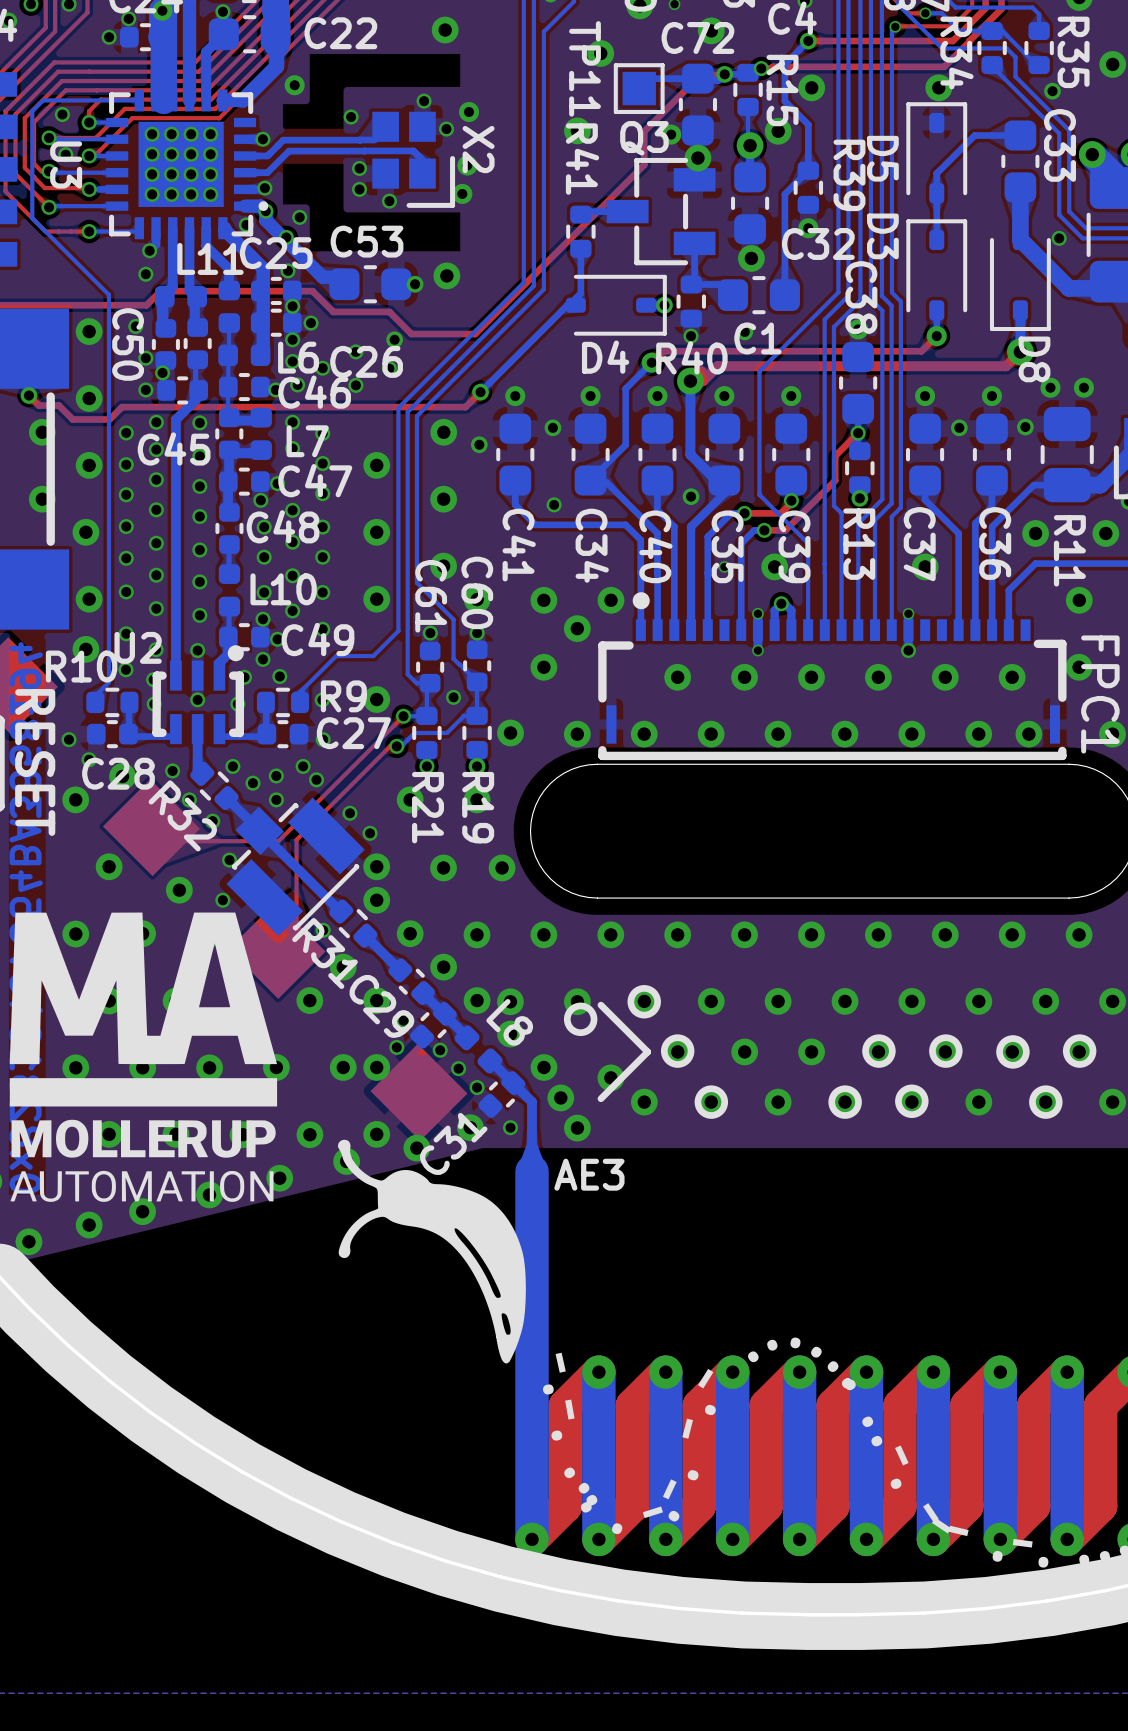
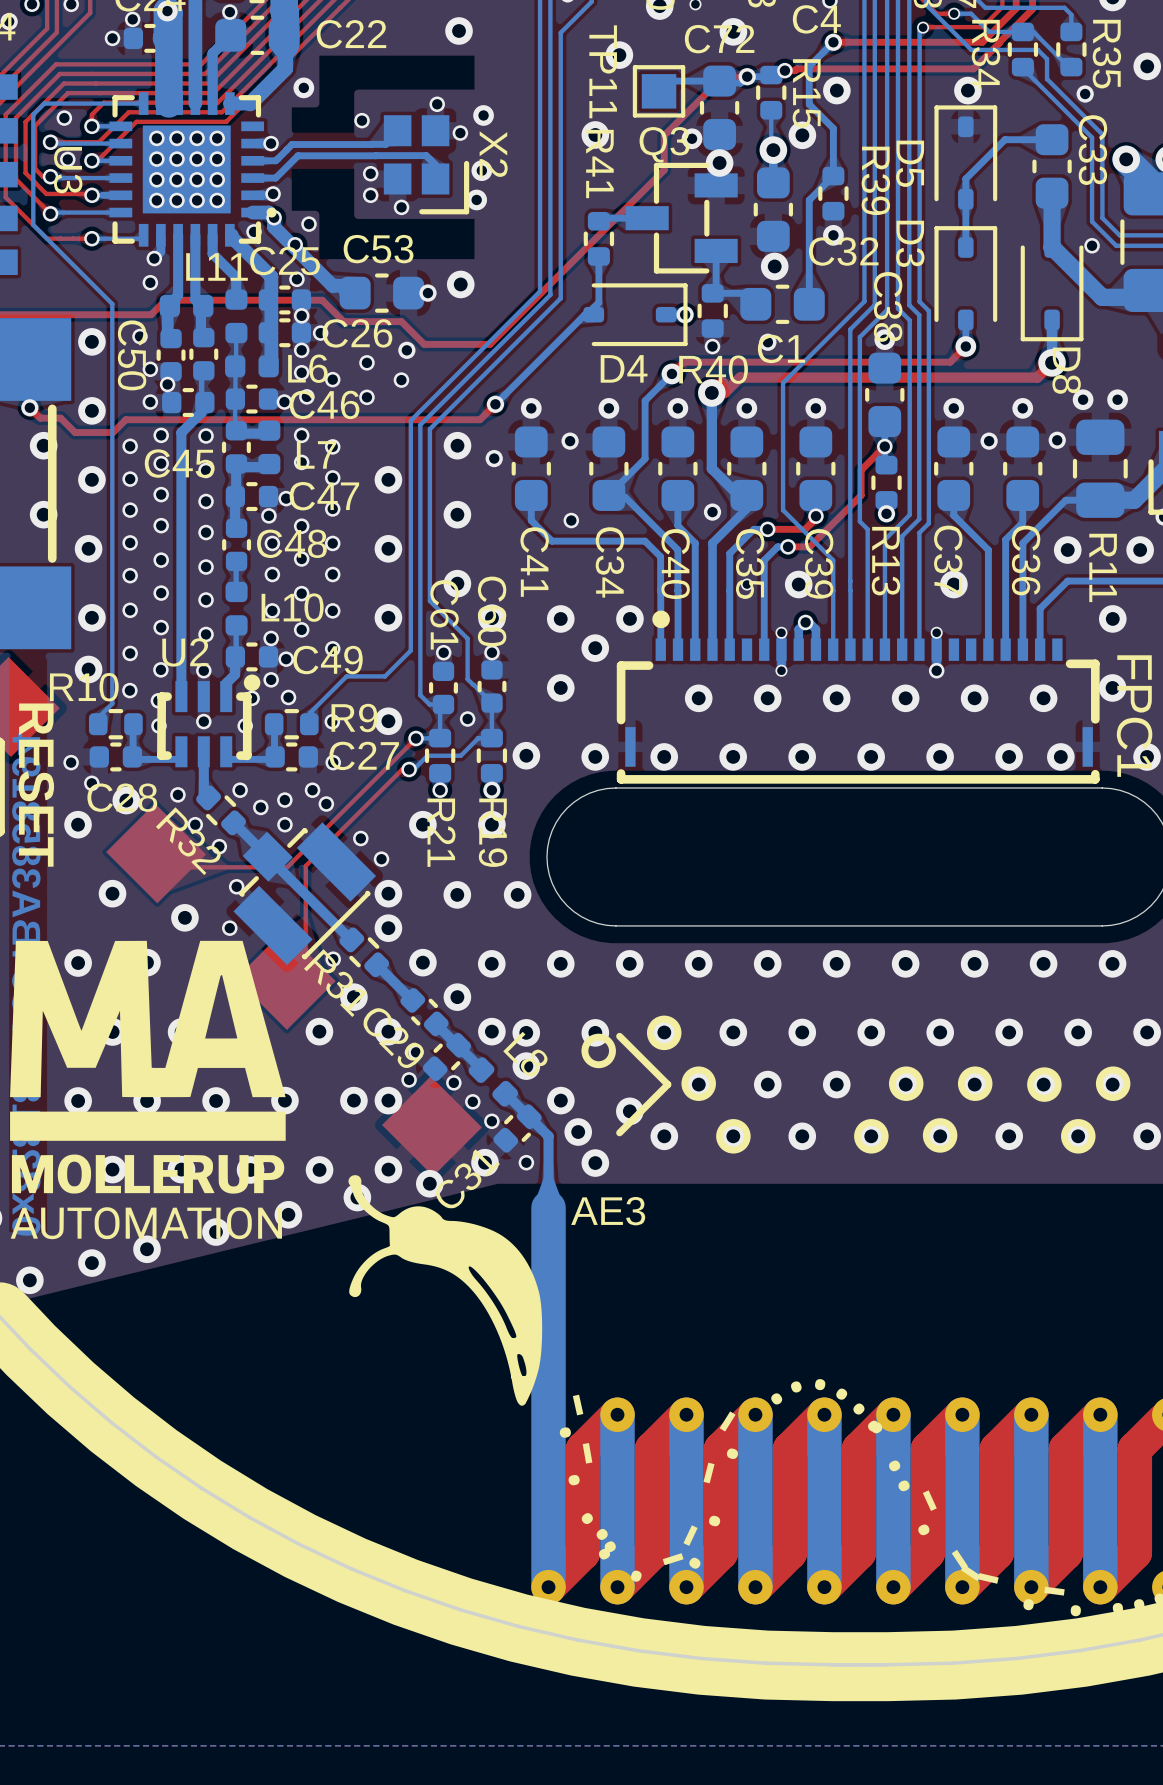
C26 name position: C26 (366, 361) -> C26 (357, 333)
U2 footprint: [152, 645, 245, 745] -> [157, 674, 261, 768]
U2 name position: U2 (138, 647) -> U2 (185, 652)

